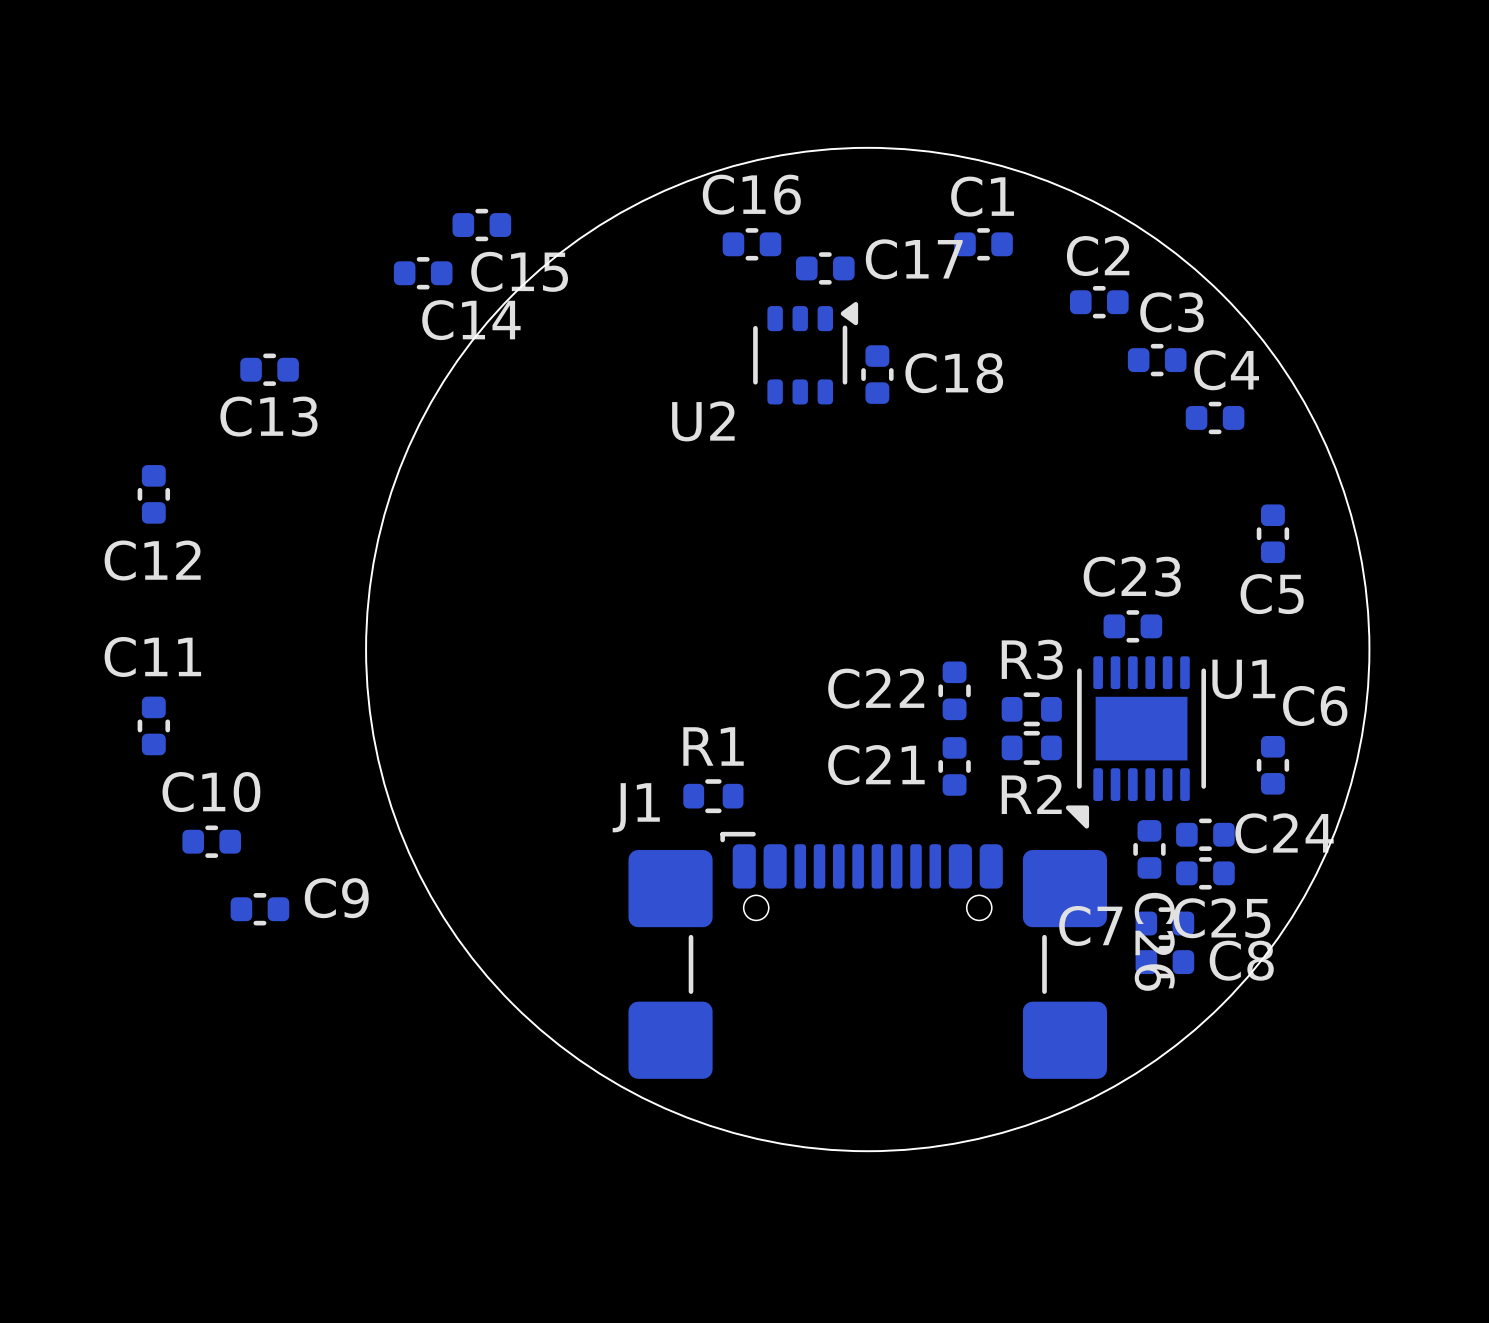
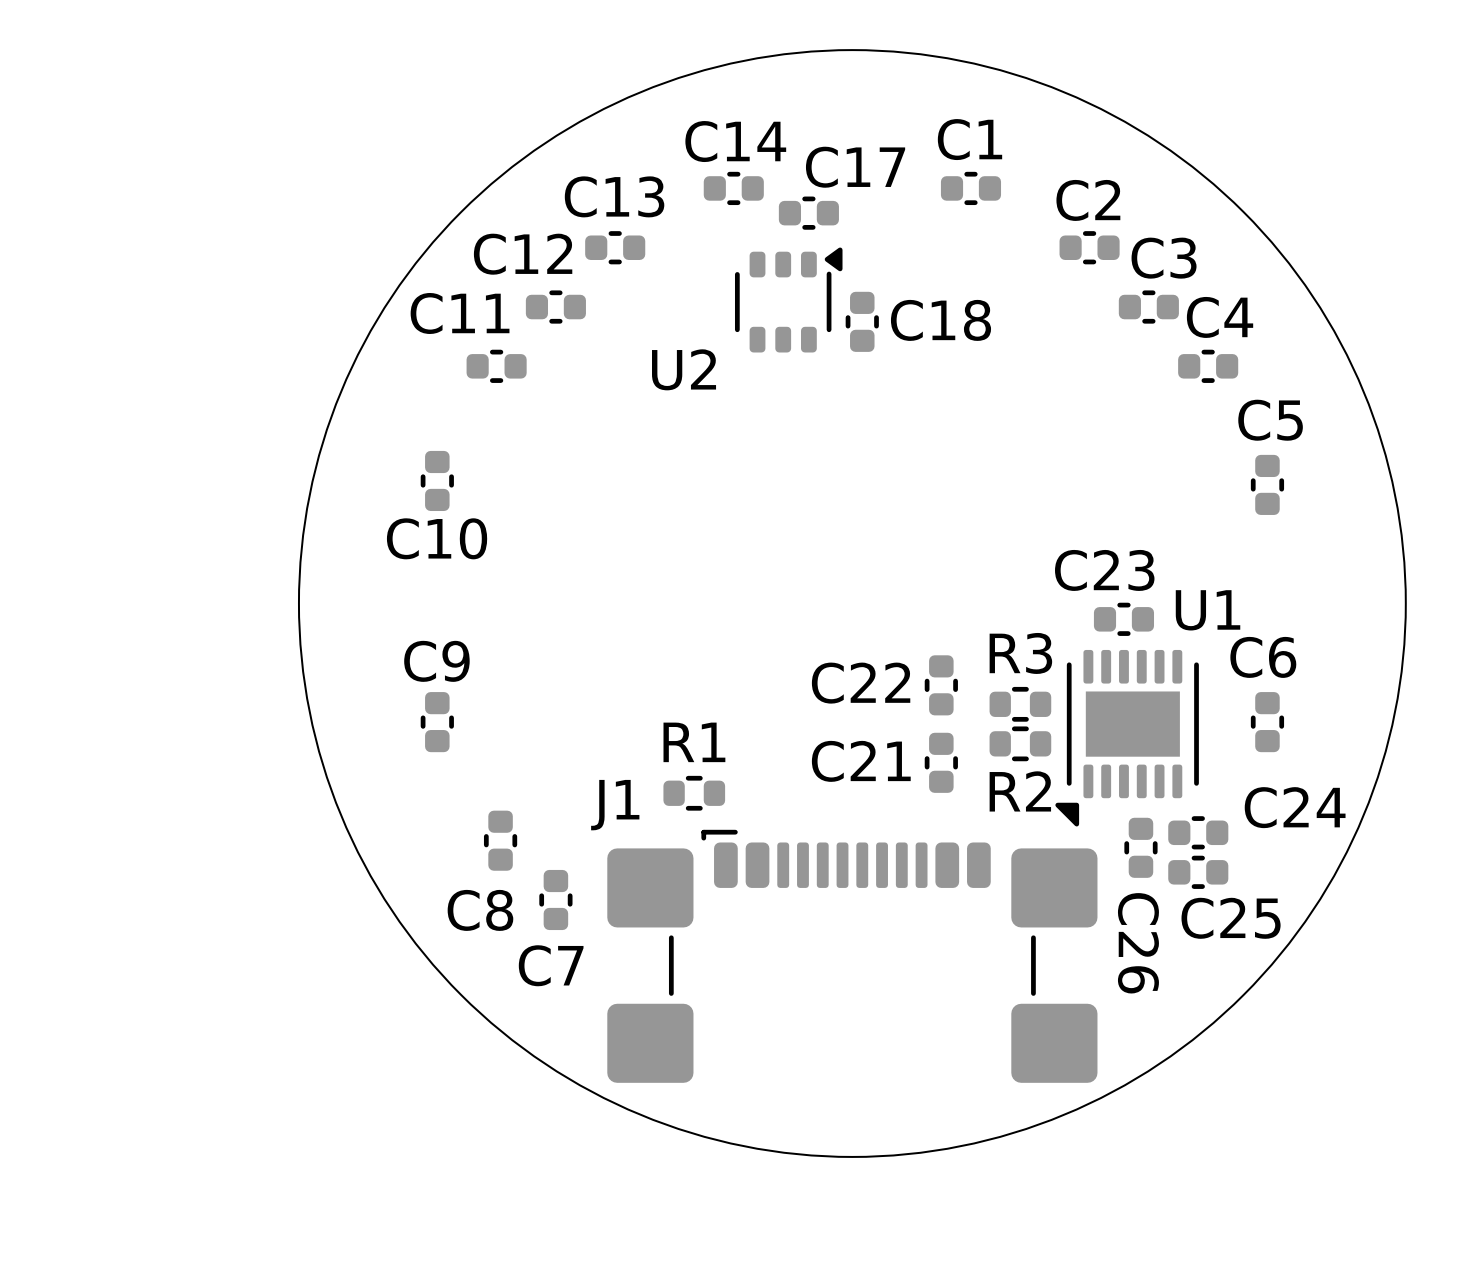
round board edge size: [365, 146, 1371, 1153] -> [297, 49, 1407, 1158]
C16 name: C16 (751, 194) -> C14 (735, 141)
C15: (481, 225) -> none
C17 name position: C17 (914, 259) -> C17 (855, 167)
C14: (423, 273) -> none
C13 position: (269, 369) -> (615, 247)
C13 name position: C13 (268, 416) -> C13 (614, 196)
C12 rotation: 0° (153, 494) -> 90° clockwise (555, 307)
C12 position: (153, 494) -> (555, 307)
C23 name position: C23 (1132, 576) -> C23 (1104, 570)
C5 name position: C5 (1272, 594) -> C5 (1270, 420)
C23 position: (1132, 626) -> (1123, 619)
U1 name position: U1 (1243, 679) -> U1 (1208, 610)
C22 position: (954, 690) -> (941, 685)
C6 name position: C6 (1315, 705) -> C6 (1263, 657)
R3: (1031, 709) -> none
C11 rotation: 0° (153, 725) -> 90° clockwise (496, 366)
C11 position: (153, 725) -> (496, 366)
U1 position: (1135, 742) -> (1127, 738)
C21 position: (954, 766) -> (941, 762)
R2: none -> (1020, 743)
R2 name: R2 (1031, 794) -> R3 (1020, 653)
R1 position: (713, 796) -> (694, 793)
J1 footprint: [628, 831, 1108, 1079] -> [607, 829, 1098, 1083]
C24: (1205, 834) -> none
C10 rotation: 0° (211, 841) -> 90° clockwise (437, 480)
C10 position: (211, 841) -> (437, 480)
C26 position: (1149, 849) -> (1140, 847)
C9 name position: C9 (336, 898) -> C9 (436, 661)
C9 rotation: 0° (259, 909) -> 90° clockwise (437, 722)
C9 position: (259, 909) -> (437, 722)
C25: none -> (1198, 872)
C25 name: C25 (1221, 918) -> C24 (1295, 807)
C7 rotation: 0° (1164, 923) -> 90° clockwise (555, 899)
C7 position: (1164, 923) -> (555, 899)
C7 name position: C7 (1090, 925) -> C7 (551, 965)
C26 name position: C26 (1154, 941) -> C26 (1138, 943)
C8 rotation: 0° (1164, 962) -> 90° clockwise (500, 840)
C8 position: (1164, 962) -> (500, 840)

